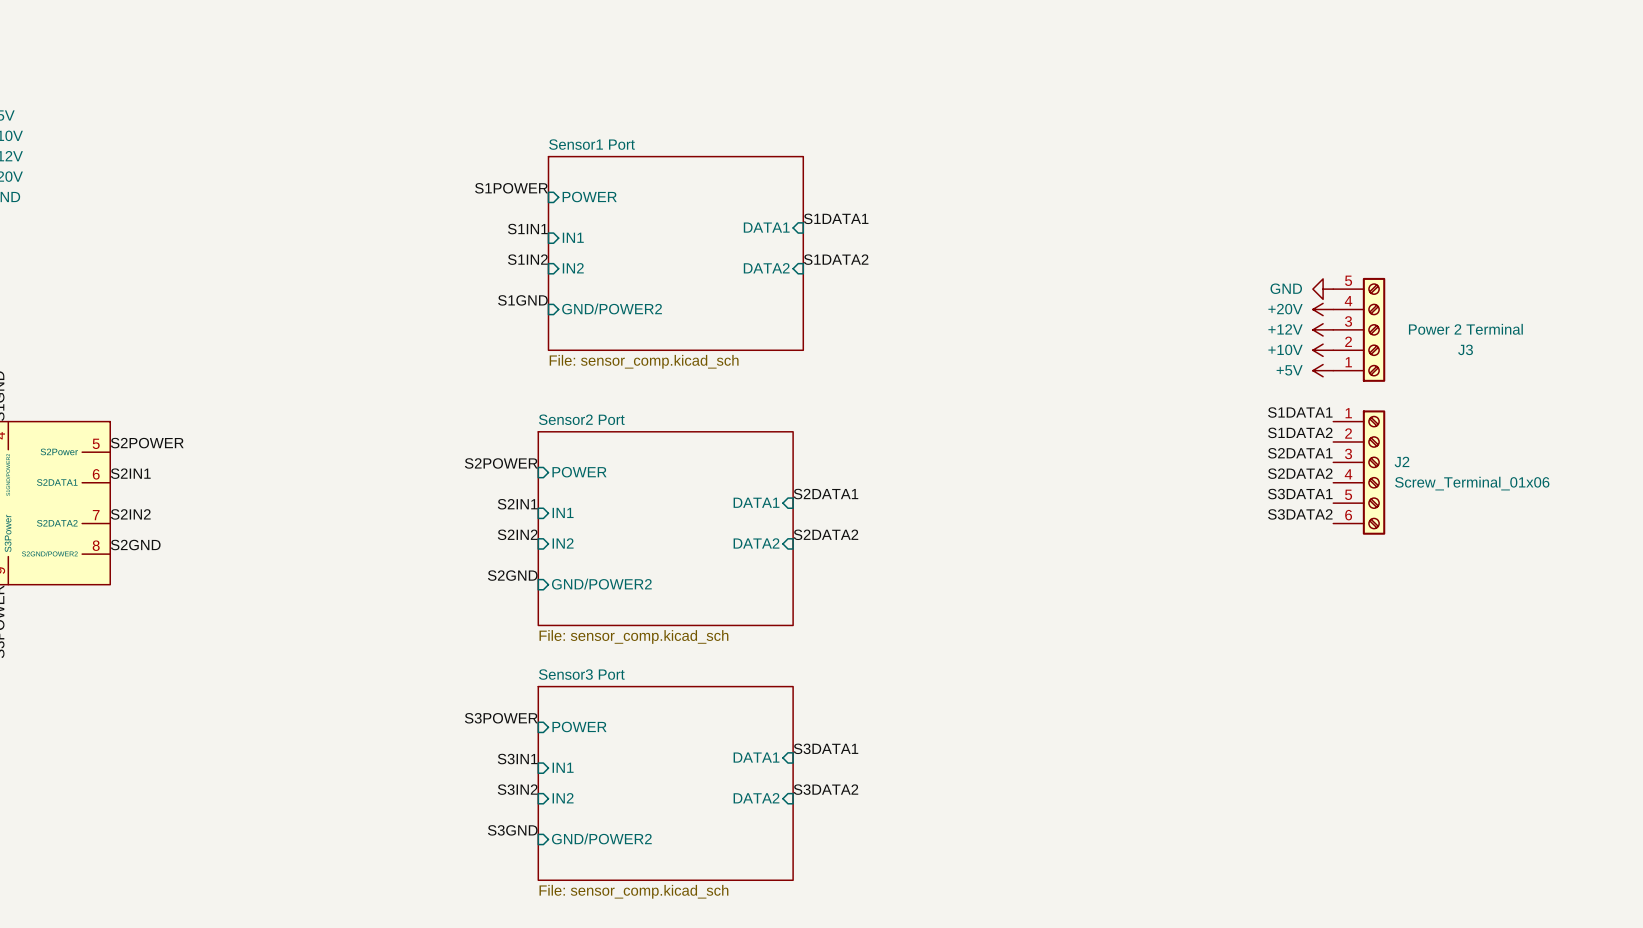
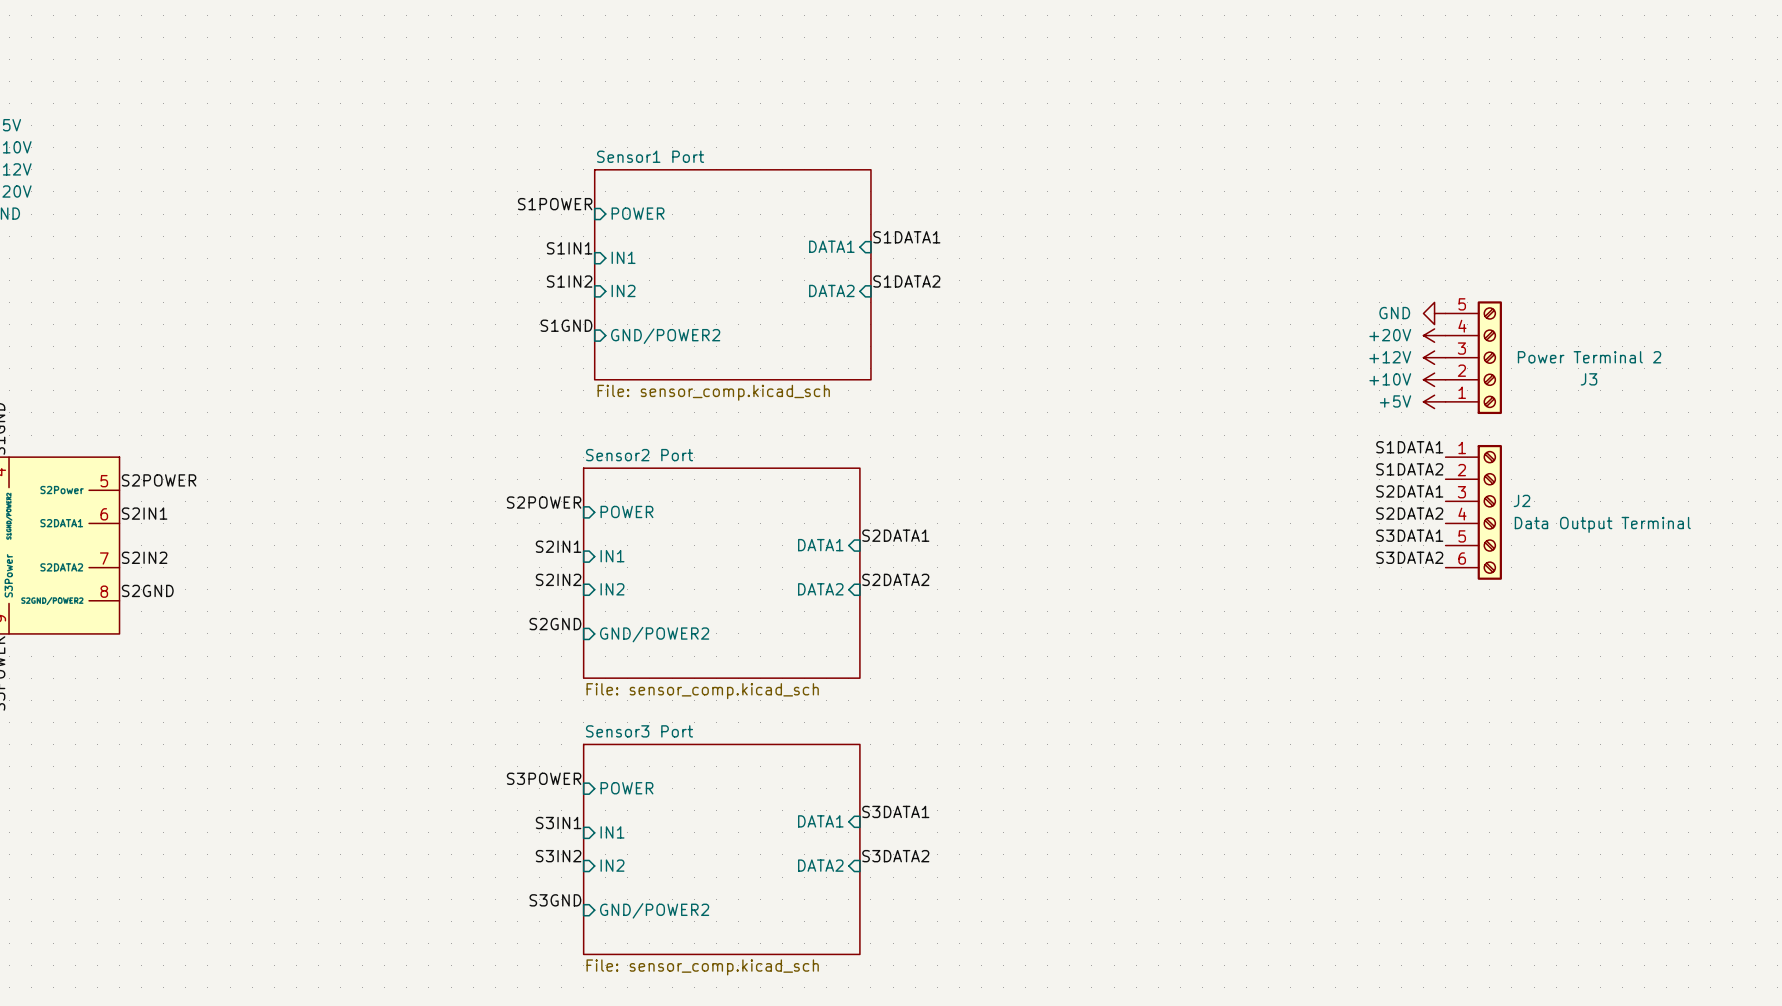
J3 value: Power 2 Terminal (1465, 329) -> Power Terminal 2 (1589, 357)
J2 value: Screw_Terminal_01x06 (1472, 483) -> Data Output Terminal (1602, 524)

